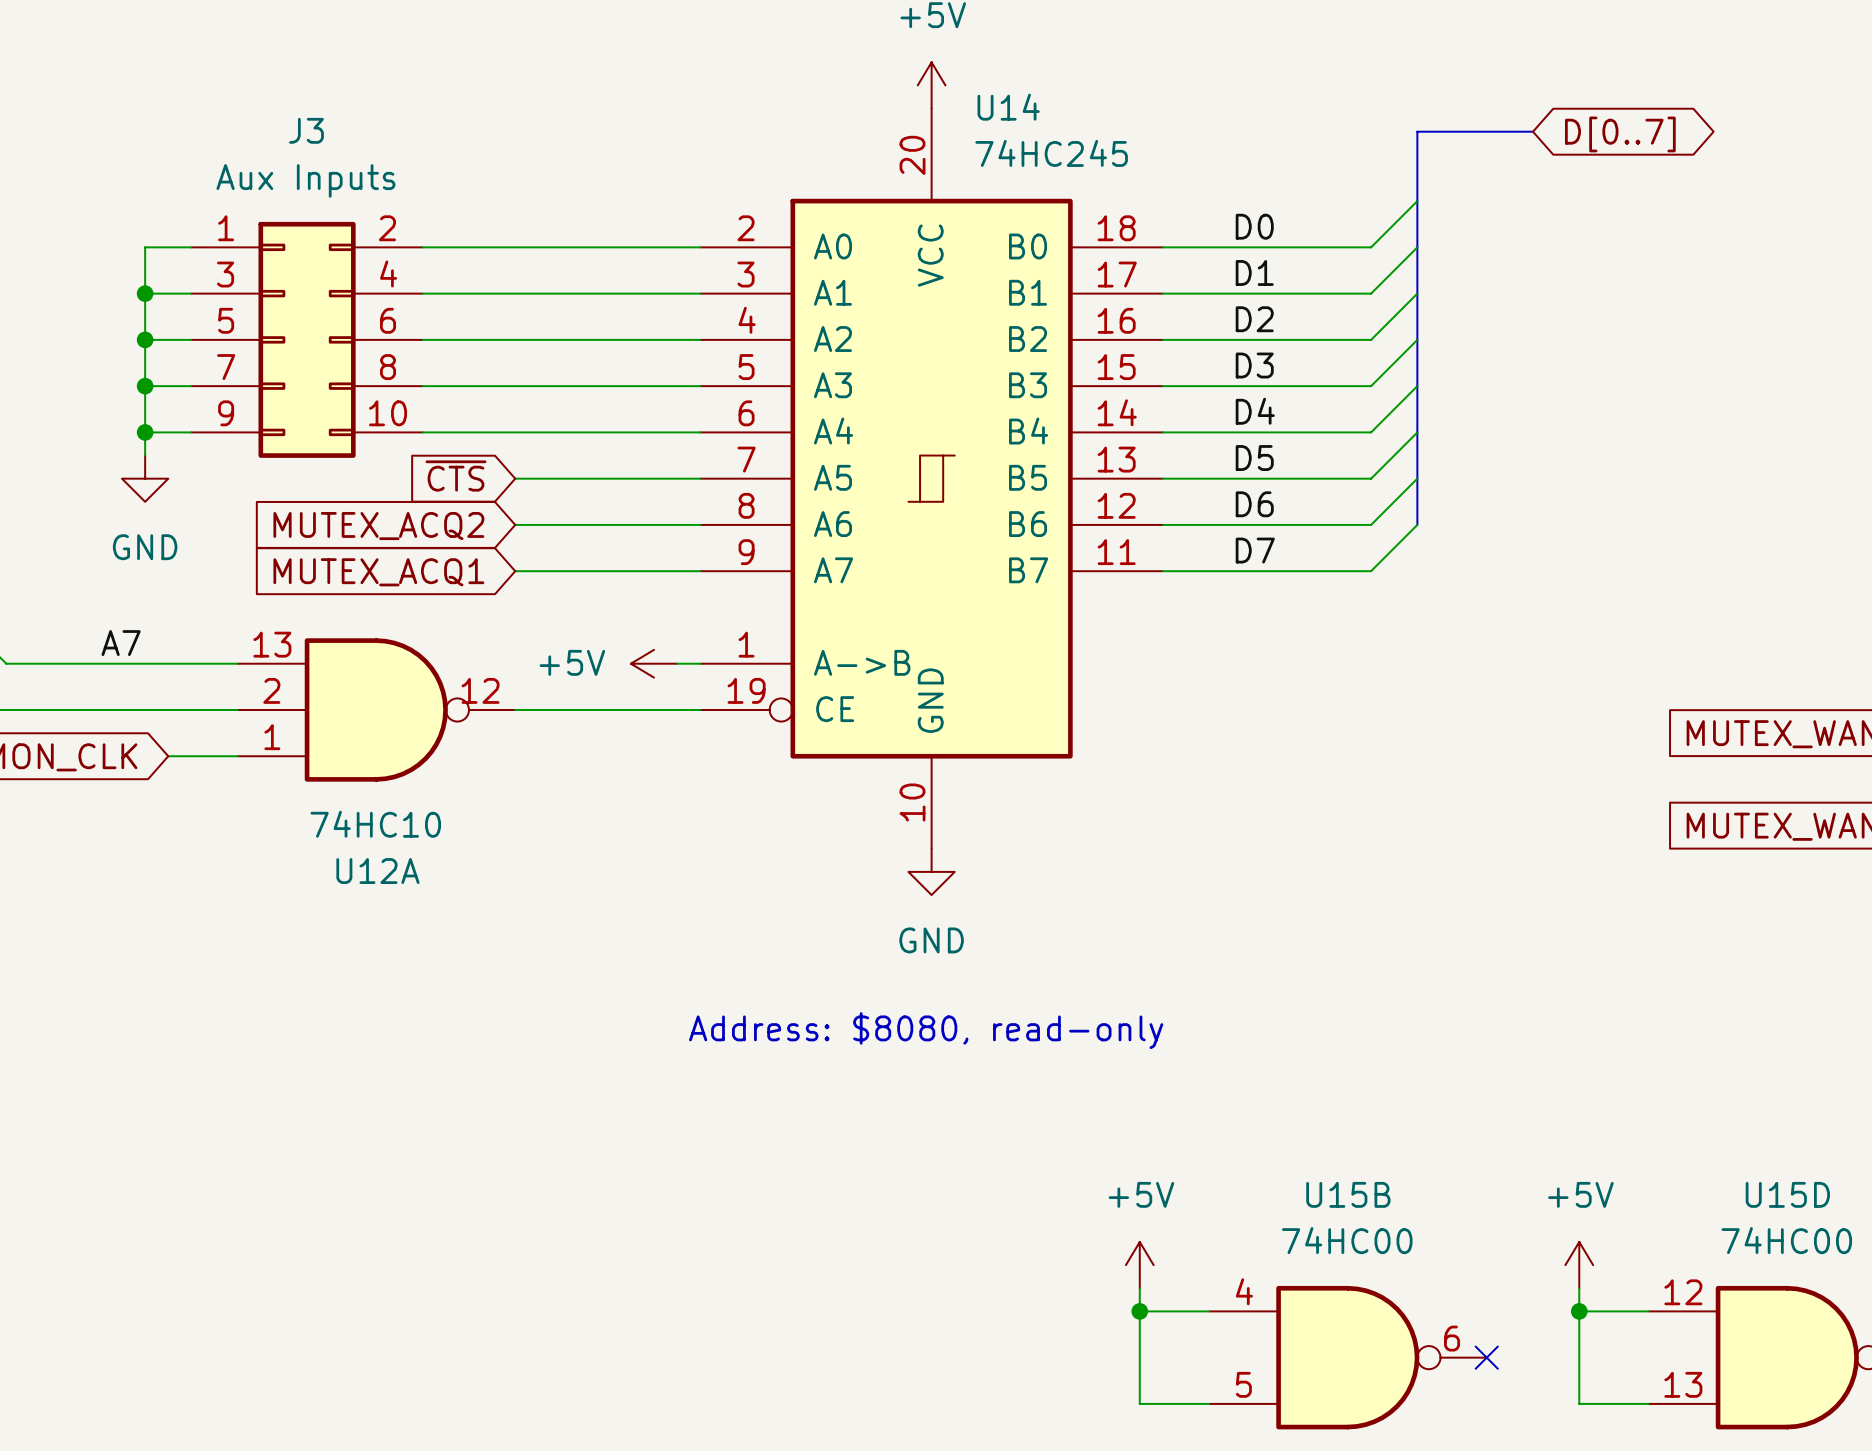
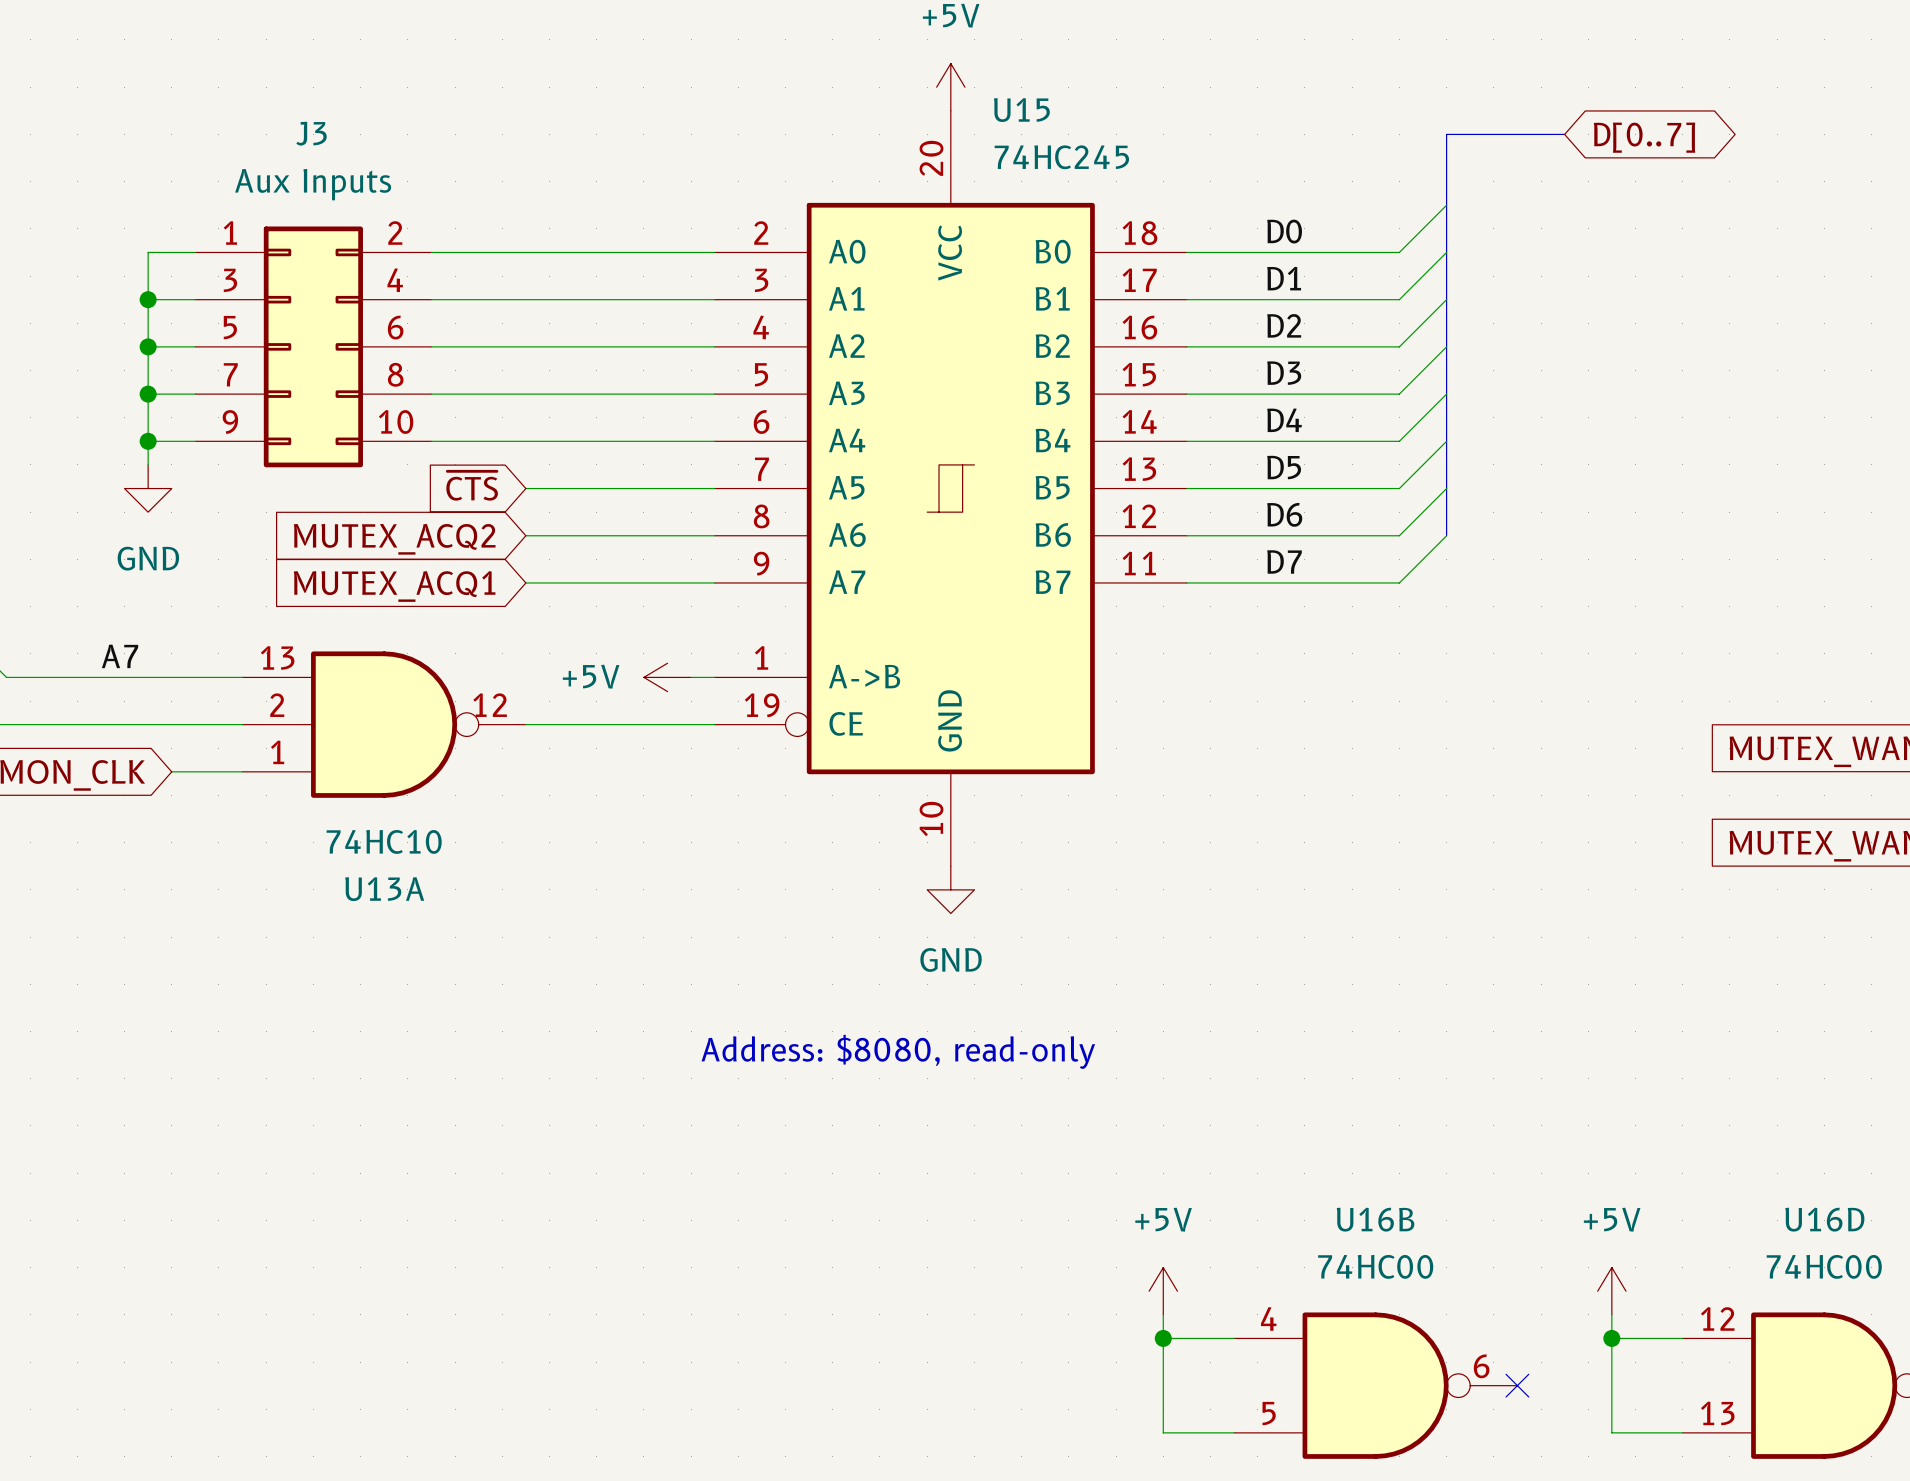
U14 name: U14 (1008, 107) -> U15 (1021, 110)
U12A name: U12A (377, 871) -> U13A (384, 889)
U15B name: U15B (1348, 1194) -> U16B (1375, 1219)
U15D name: U15D (1787, 1194) -> U16D (1824, 1219)

